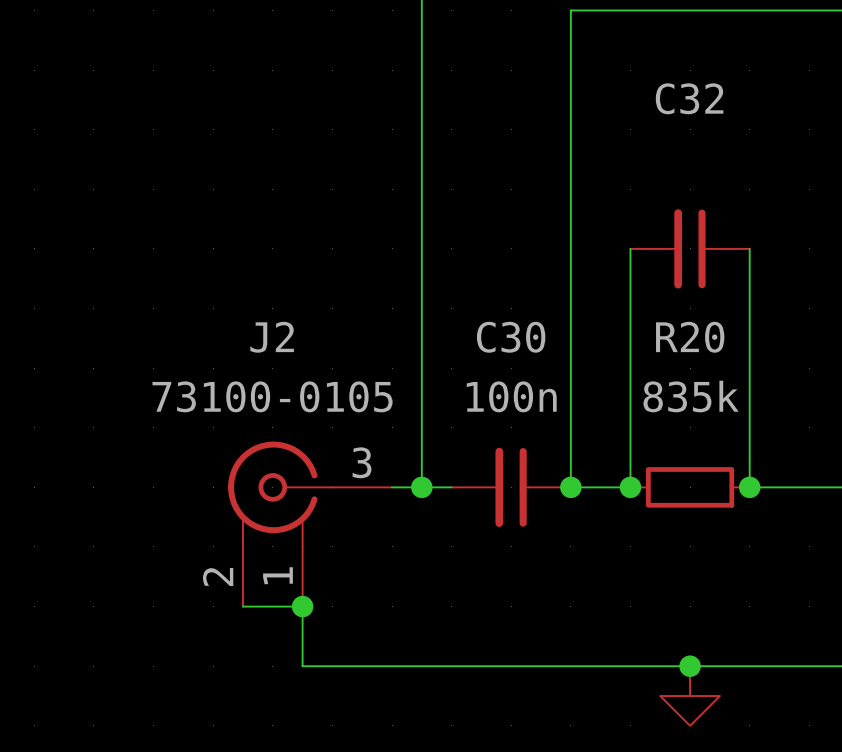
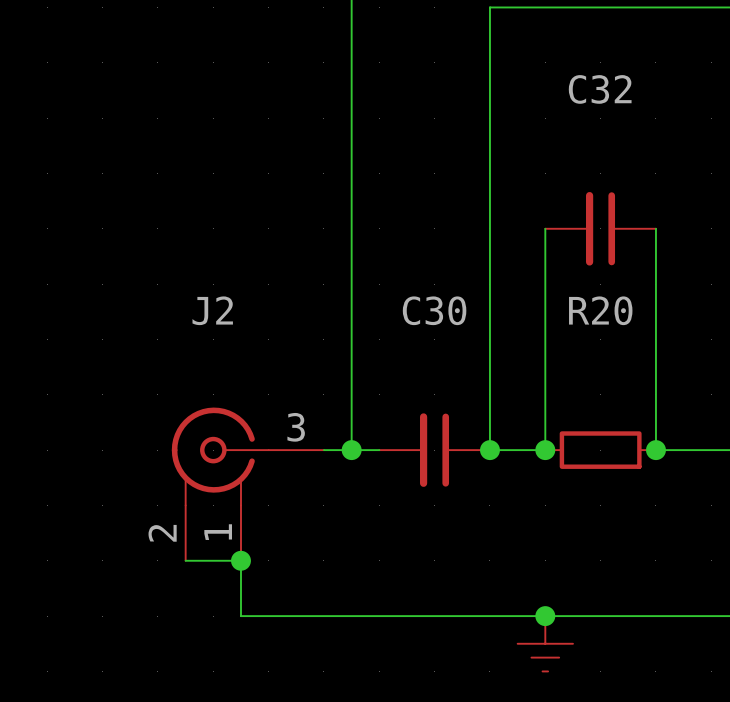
J2 value: 73100-0105 (272, 396) -> none
C30 value: 100n (511, 396) -> none
R20 value: 835k (691, 396) -> none
junction position: (690, 666) -> (545, 616)
power symbol: none -> (545, 643)
power symbol: (690, 696) -> none

